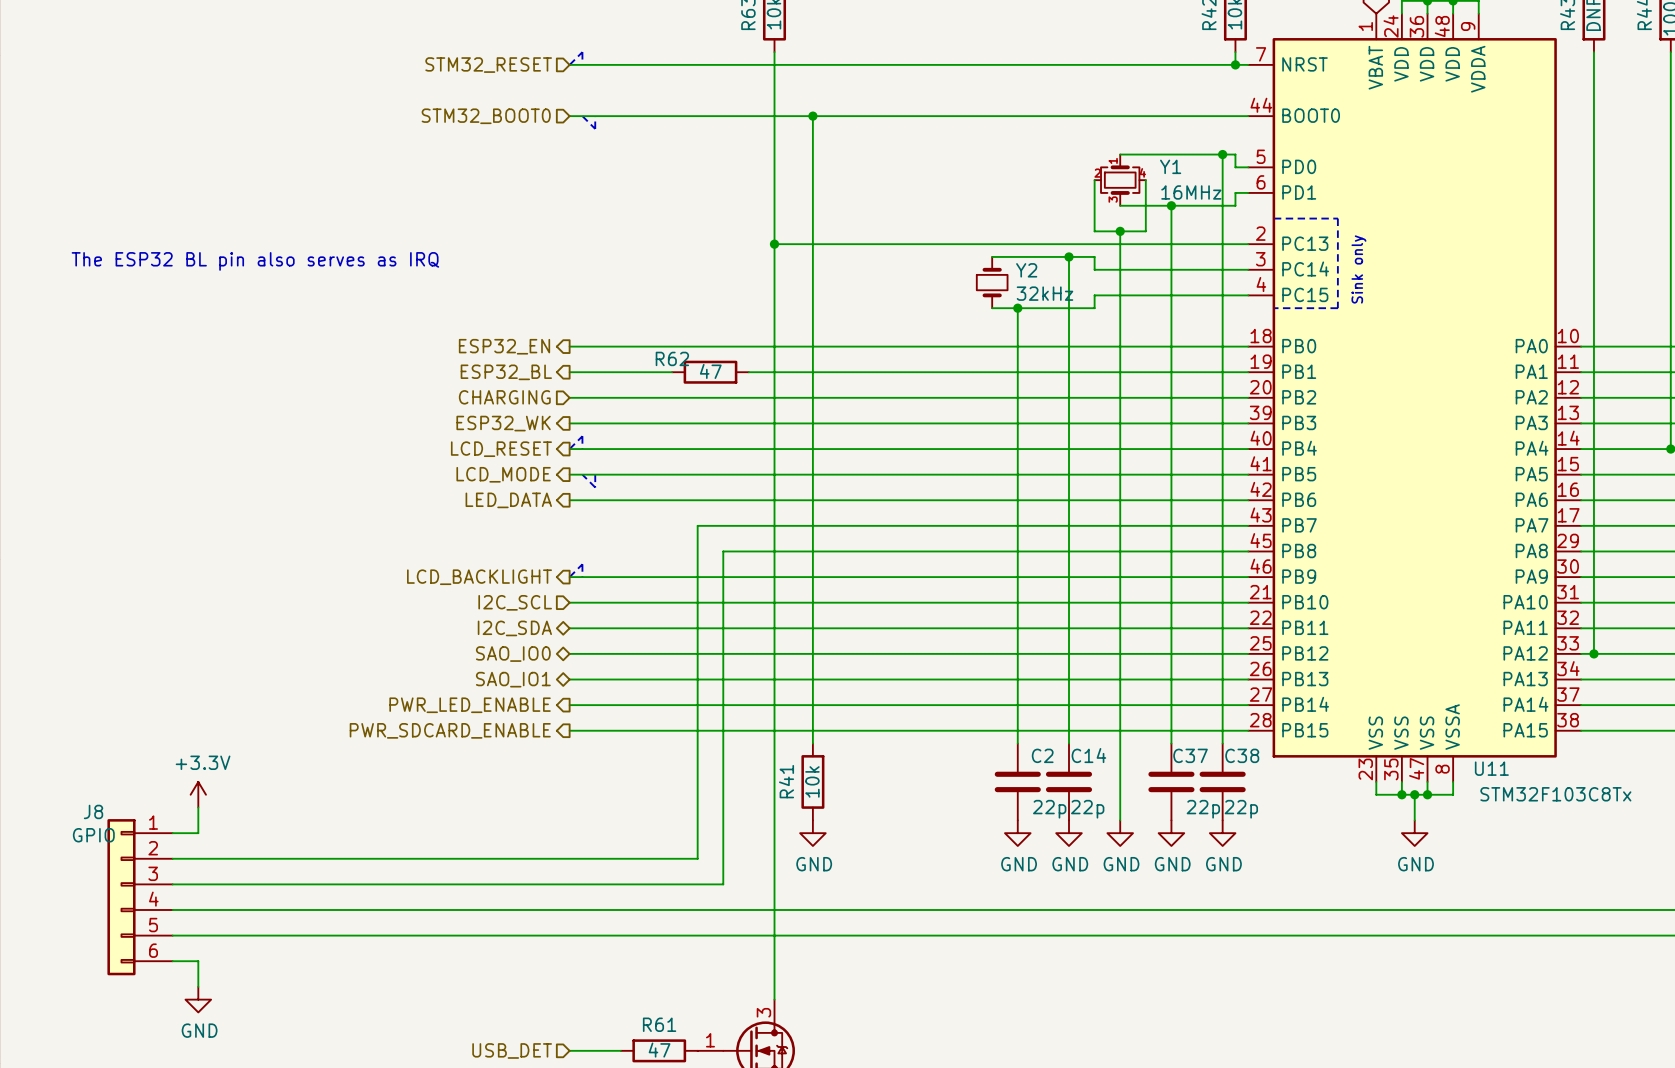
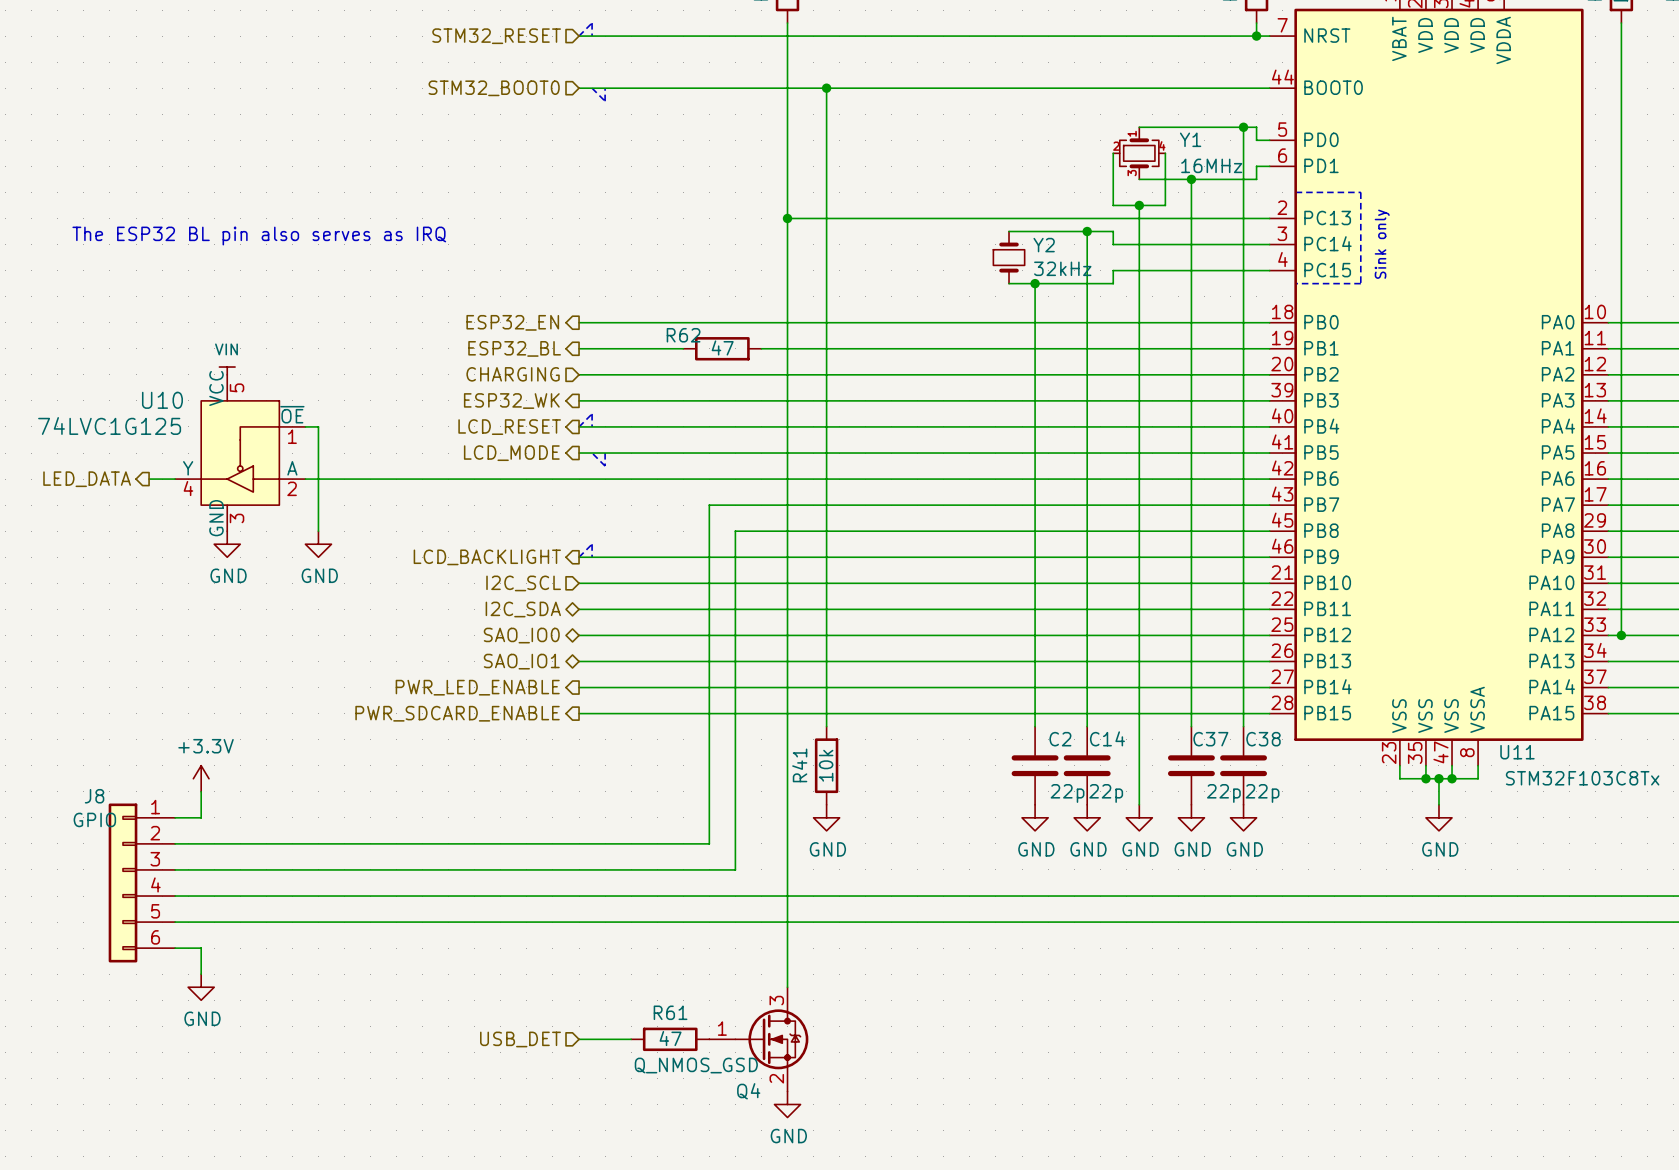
power symbol: none -> VIN (227, 370)
wire: none -> (305, 426) (318, 426) (318, 531)
U10: none -> 74LVC1G125 (240, 453)
hierarchical label: none -> LED_DATA (87, 479)
wire: none -> (149, 479) (175, 479)
wire: none -> (305, 479) (579, 479)
hierarchical label: LED_DATA (508, 500) -> none
power symbol: none -> GND (227, 544)
power symbol: none -> GND (318, 544)

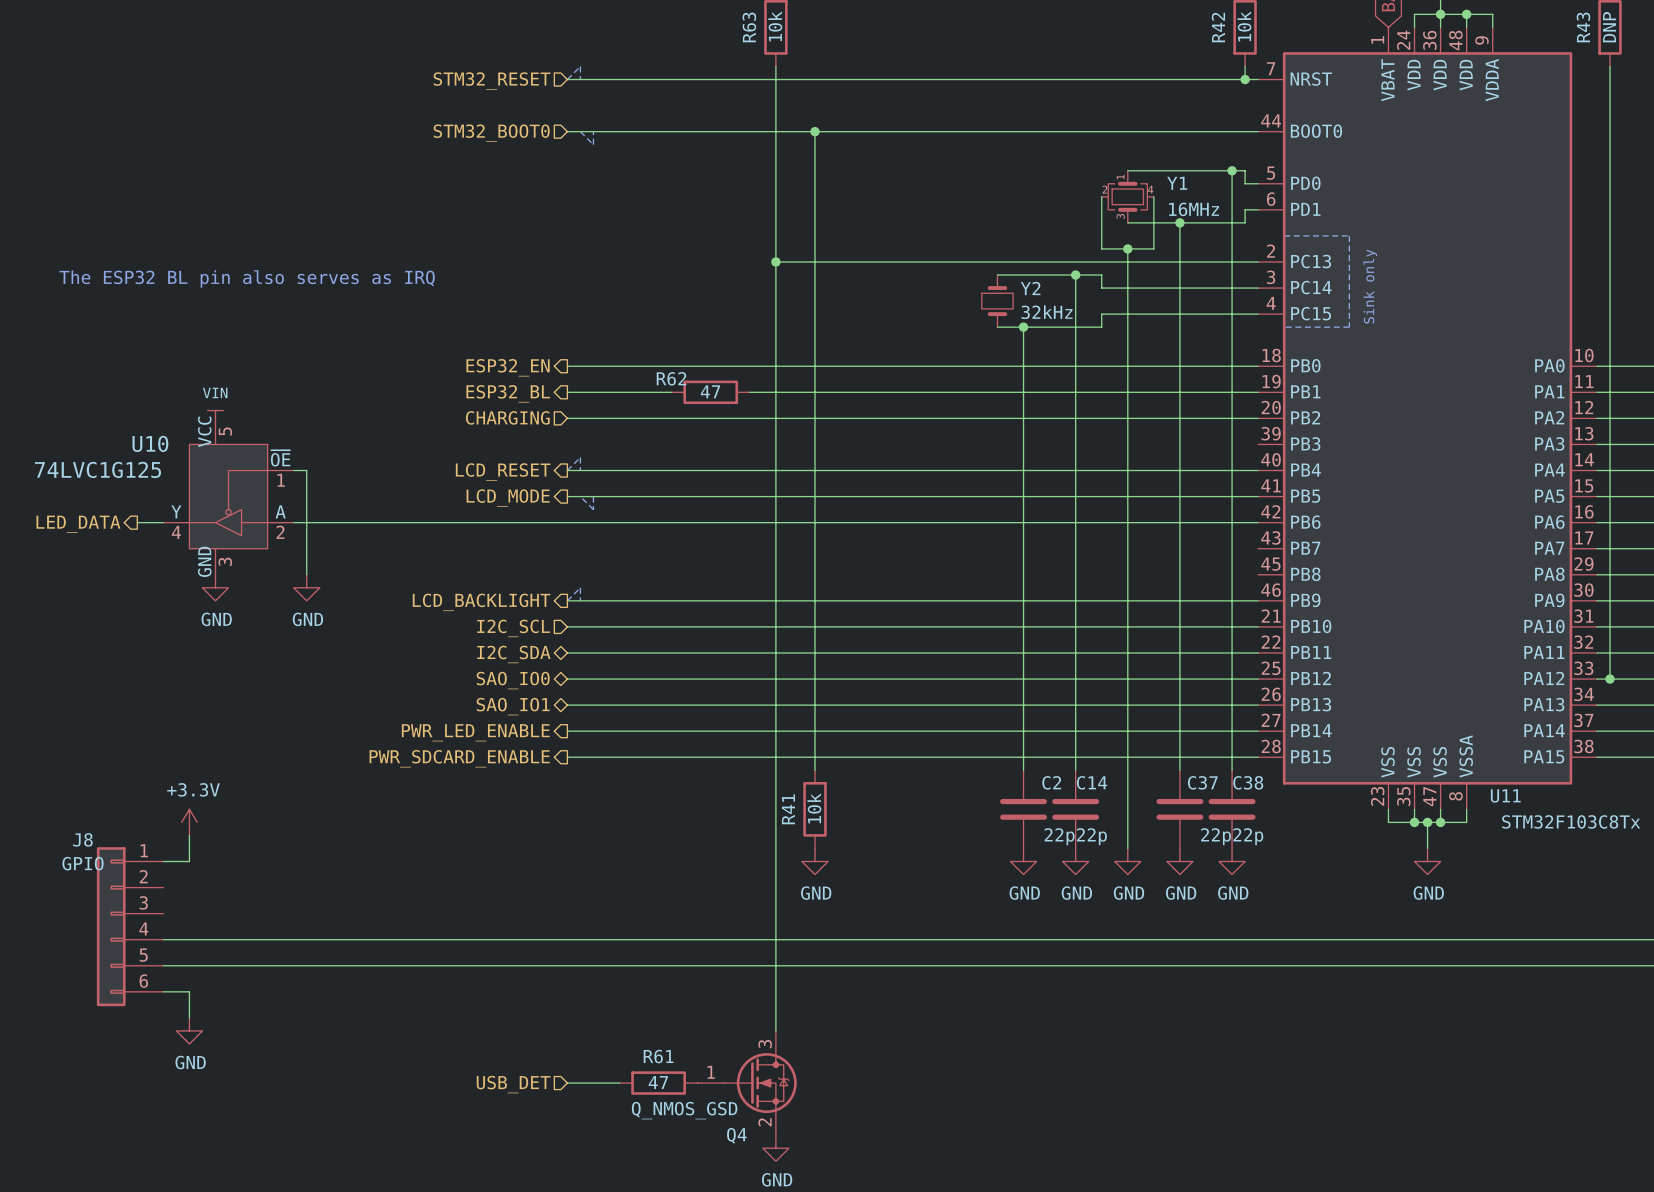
wire: (579, 400) (1269, 400) -> none
hierarchical label: ESP32_WK (511, 401) -> none
wire: (1269, 505) (709, 505) (709, 843) (175, 843) -> none
wire: (1269, 531) (735, 531) (735, 869) (175, 869) -> none

